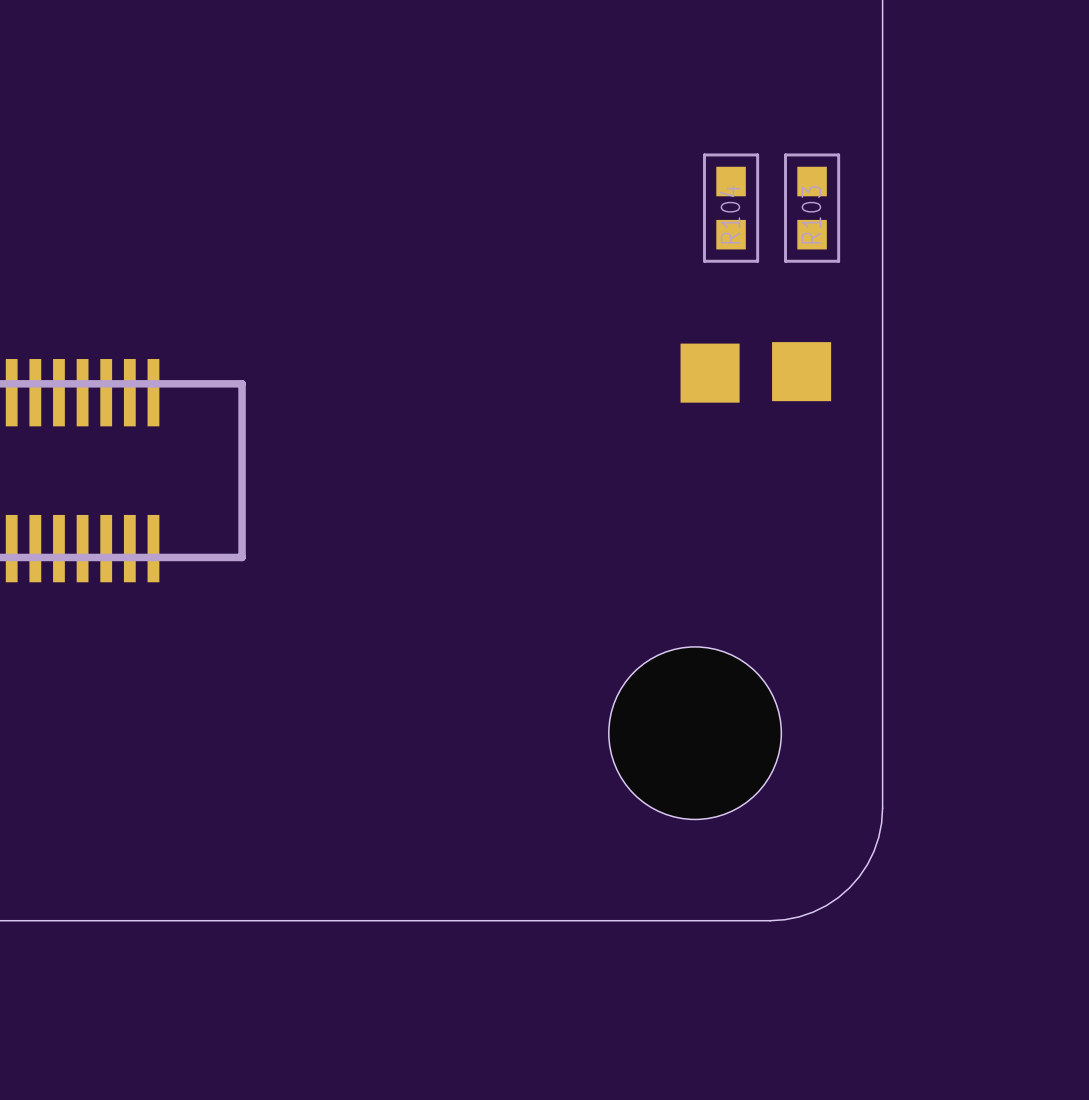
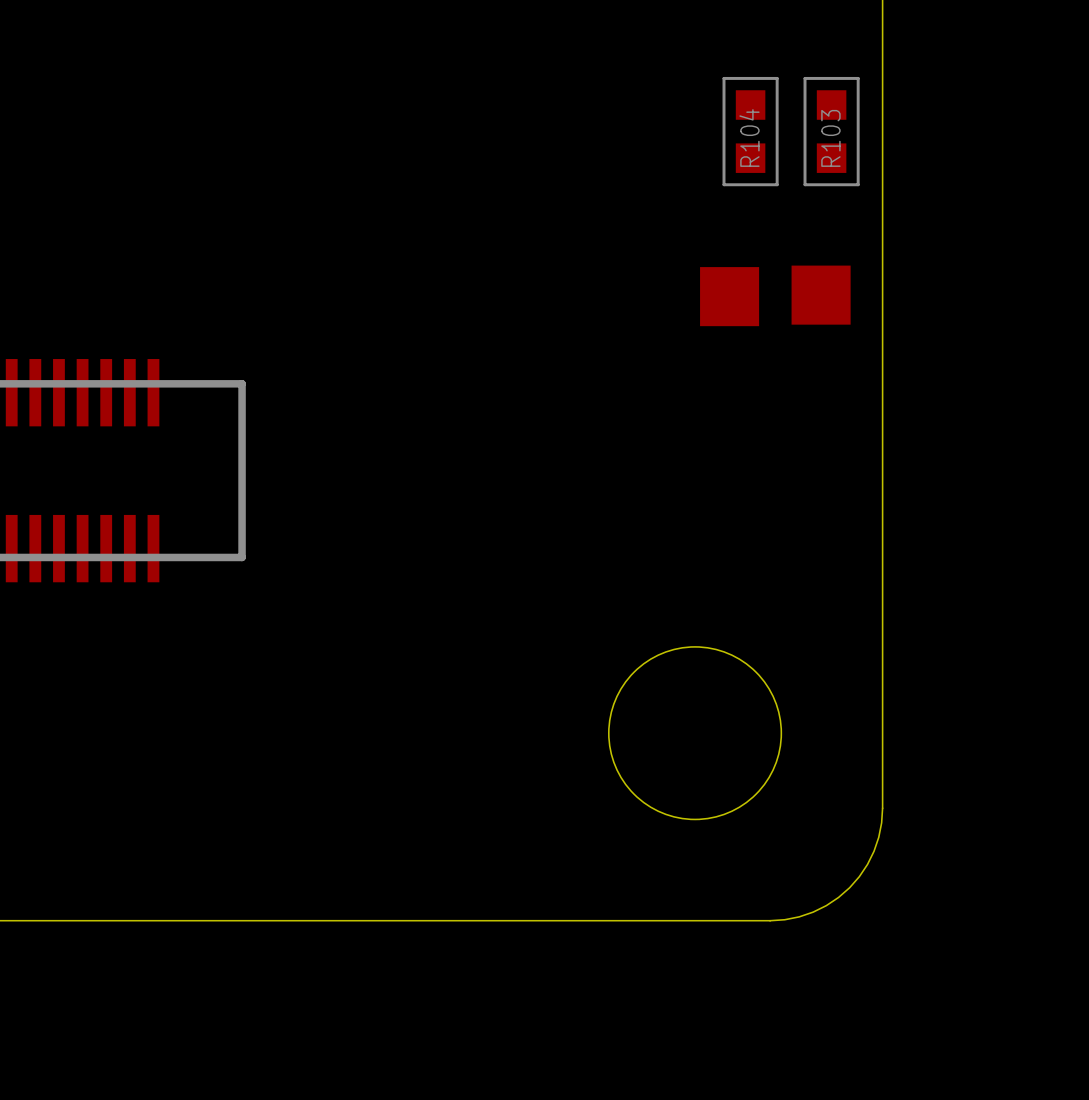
R104 position: (731, 208) -> (750, 131)
R103 position: (812, 208) -> (831, 131)
part: none -> (821, 295)
part: none -> (729, 296)
part: (801, 371) -> none
part: (710, 373) -> none

